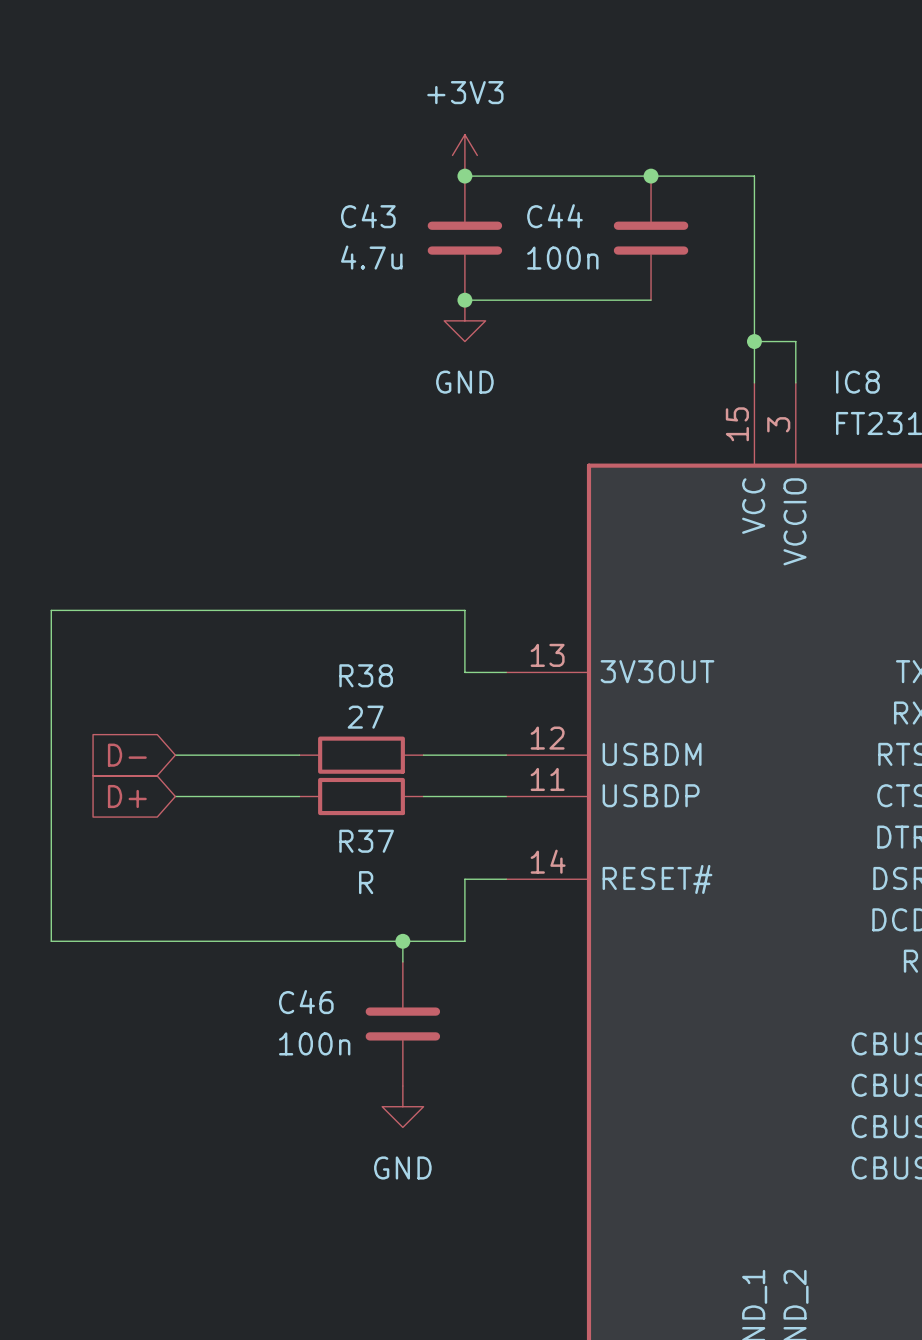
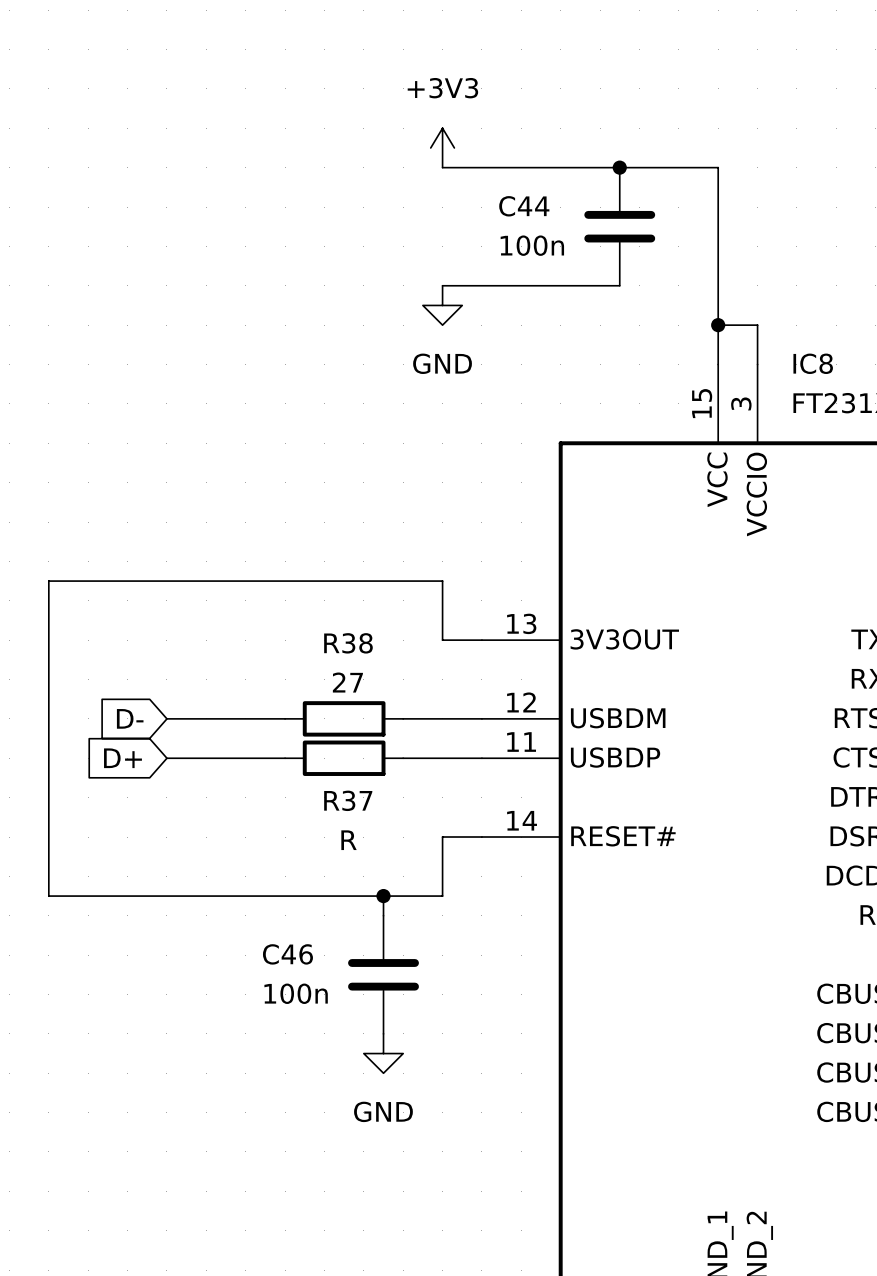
junction: (464, 176) -> none
C43: 4.7u (464, 238) -> none
junction: (464, 300) -> none

